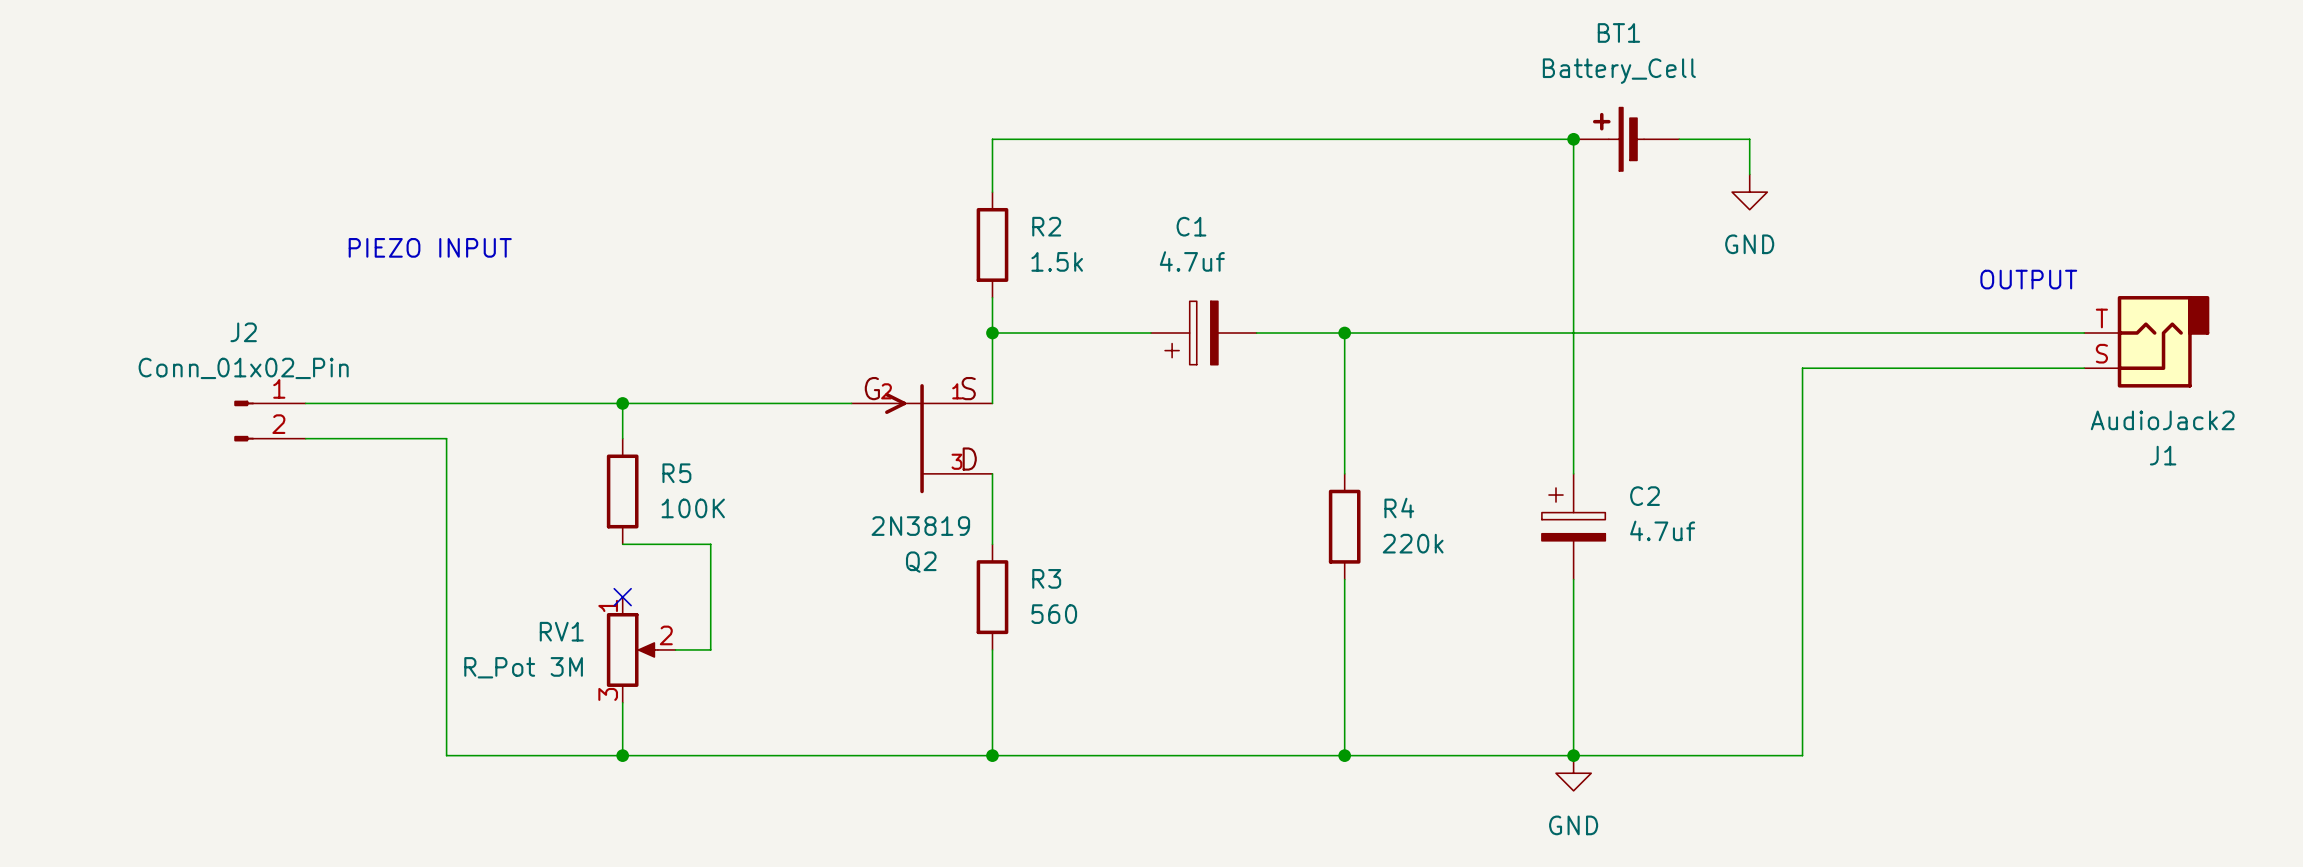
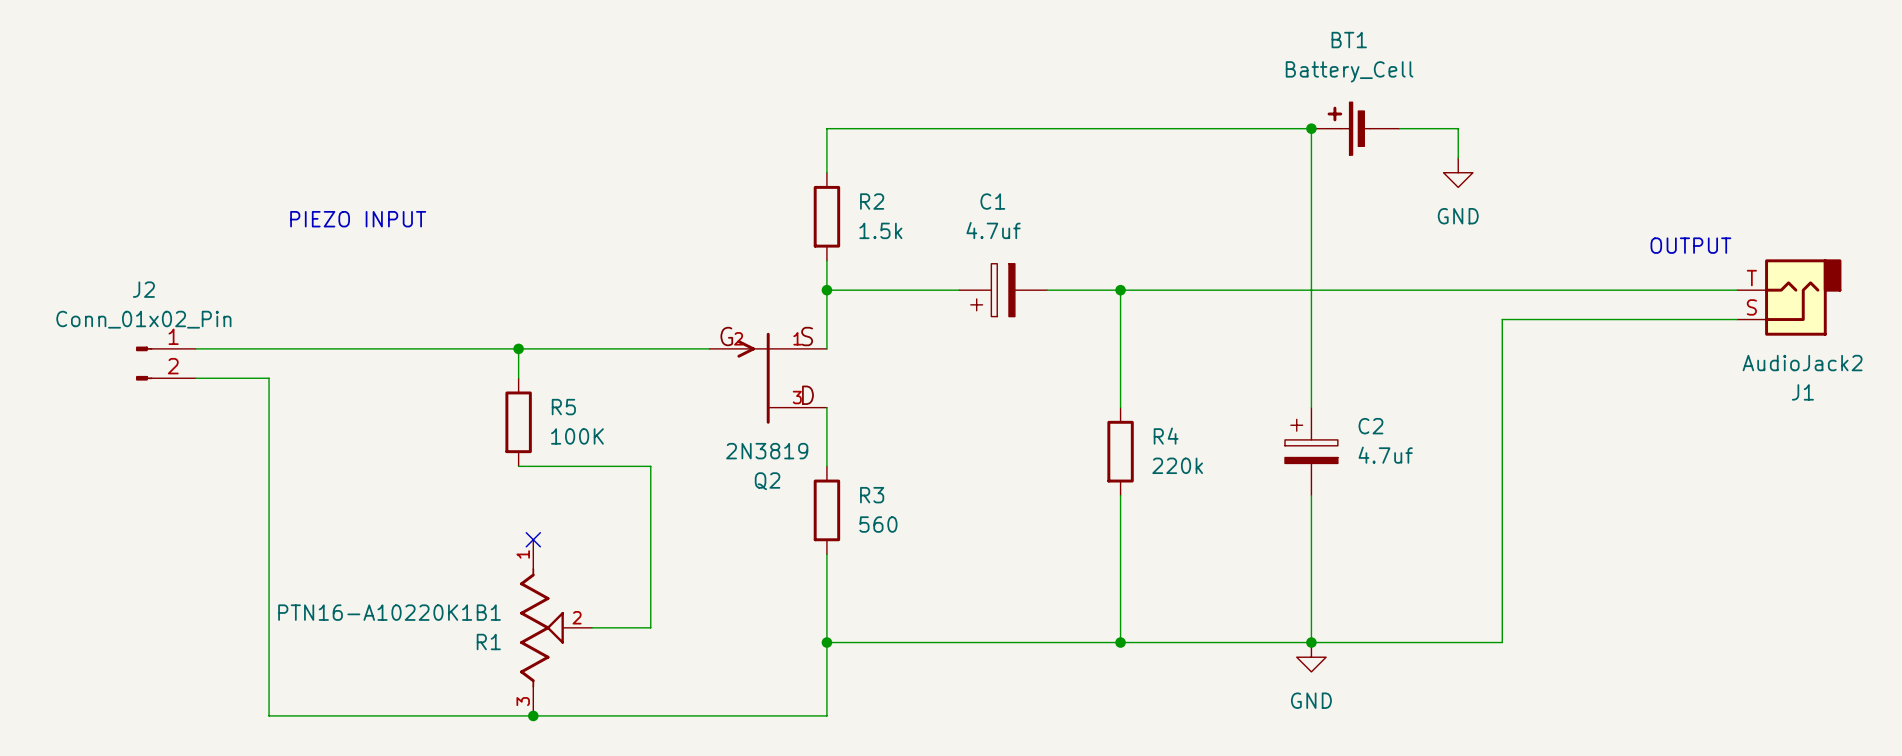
J2 position: (269, 421) -> (165, 363)
wire: (323, 438) (446, 438) (446, 755) (992, 755) -> (269, 378) (269, 715) (826, 715) (826, 642)
wire: (710, 544) (710, 649) (675, 649) -> (592, 466) (650, 466) (650, 627) (592, 627)
no-connect mark position: (622, 597) -> (533, 539)
RV1: R_Pot 3M (641, 649) -> none
wire: (622, 702) (622, 755) -> none
R1: none -> PTN16-A10220K1B1 (556, 627)
junction: (622, 755) -> none
junction: none -> (533, 715)

